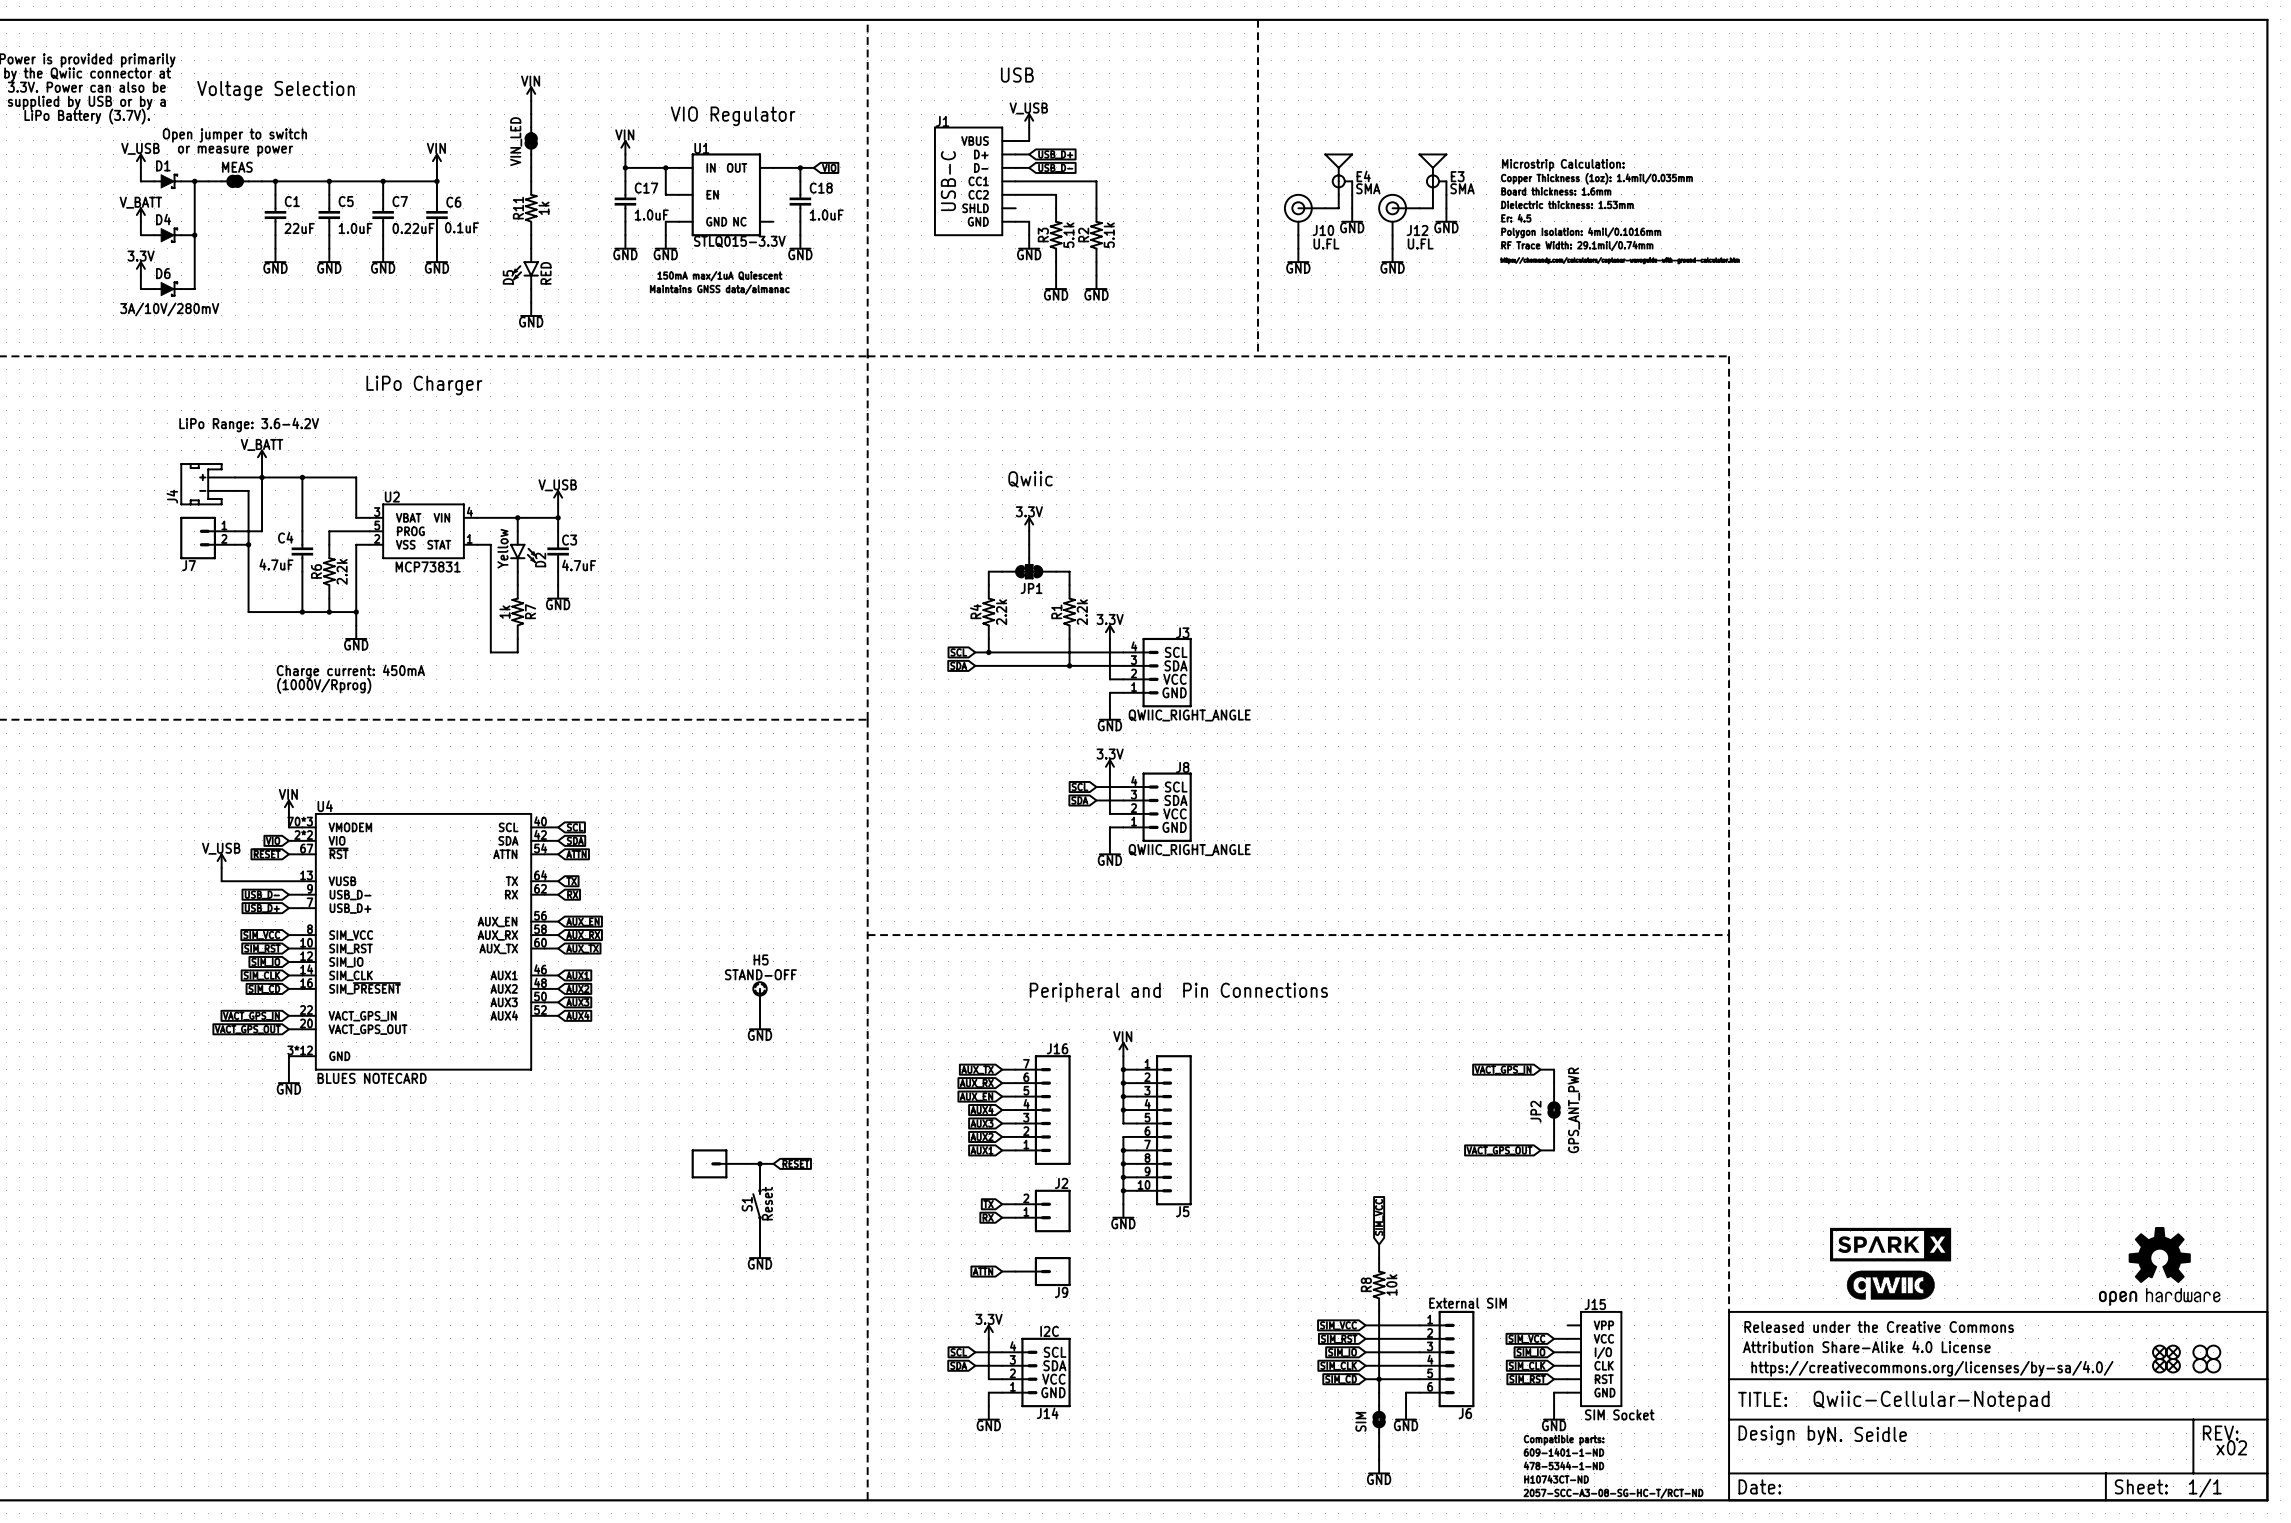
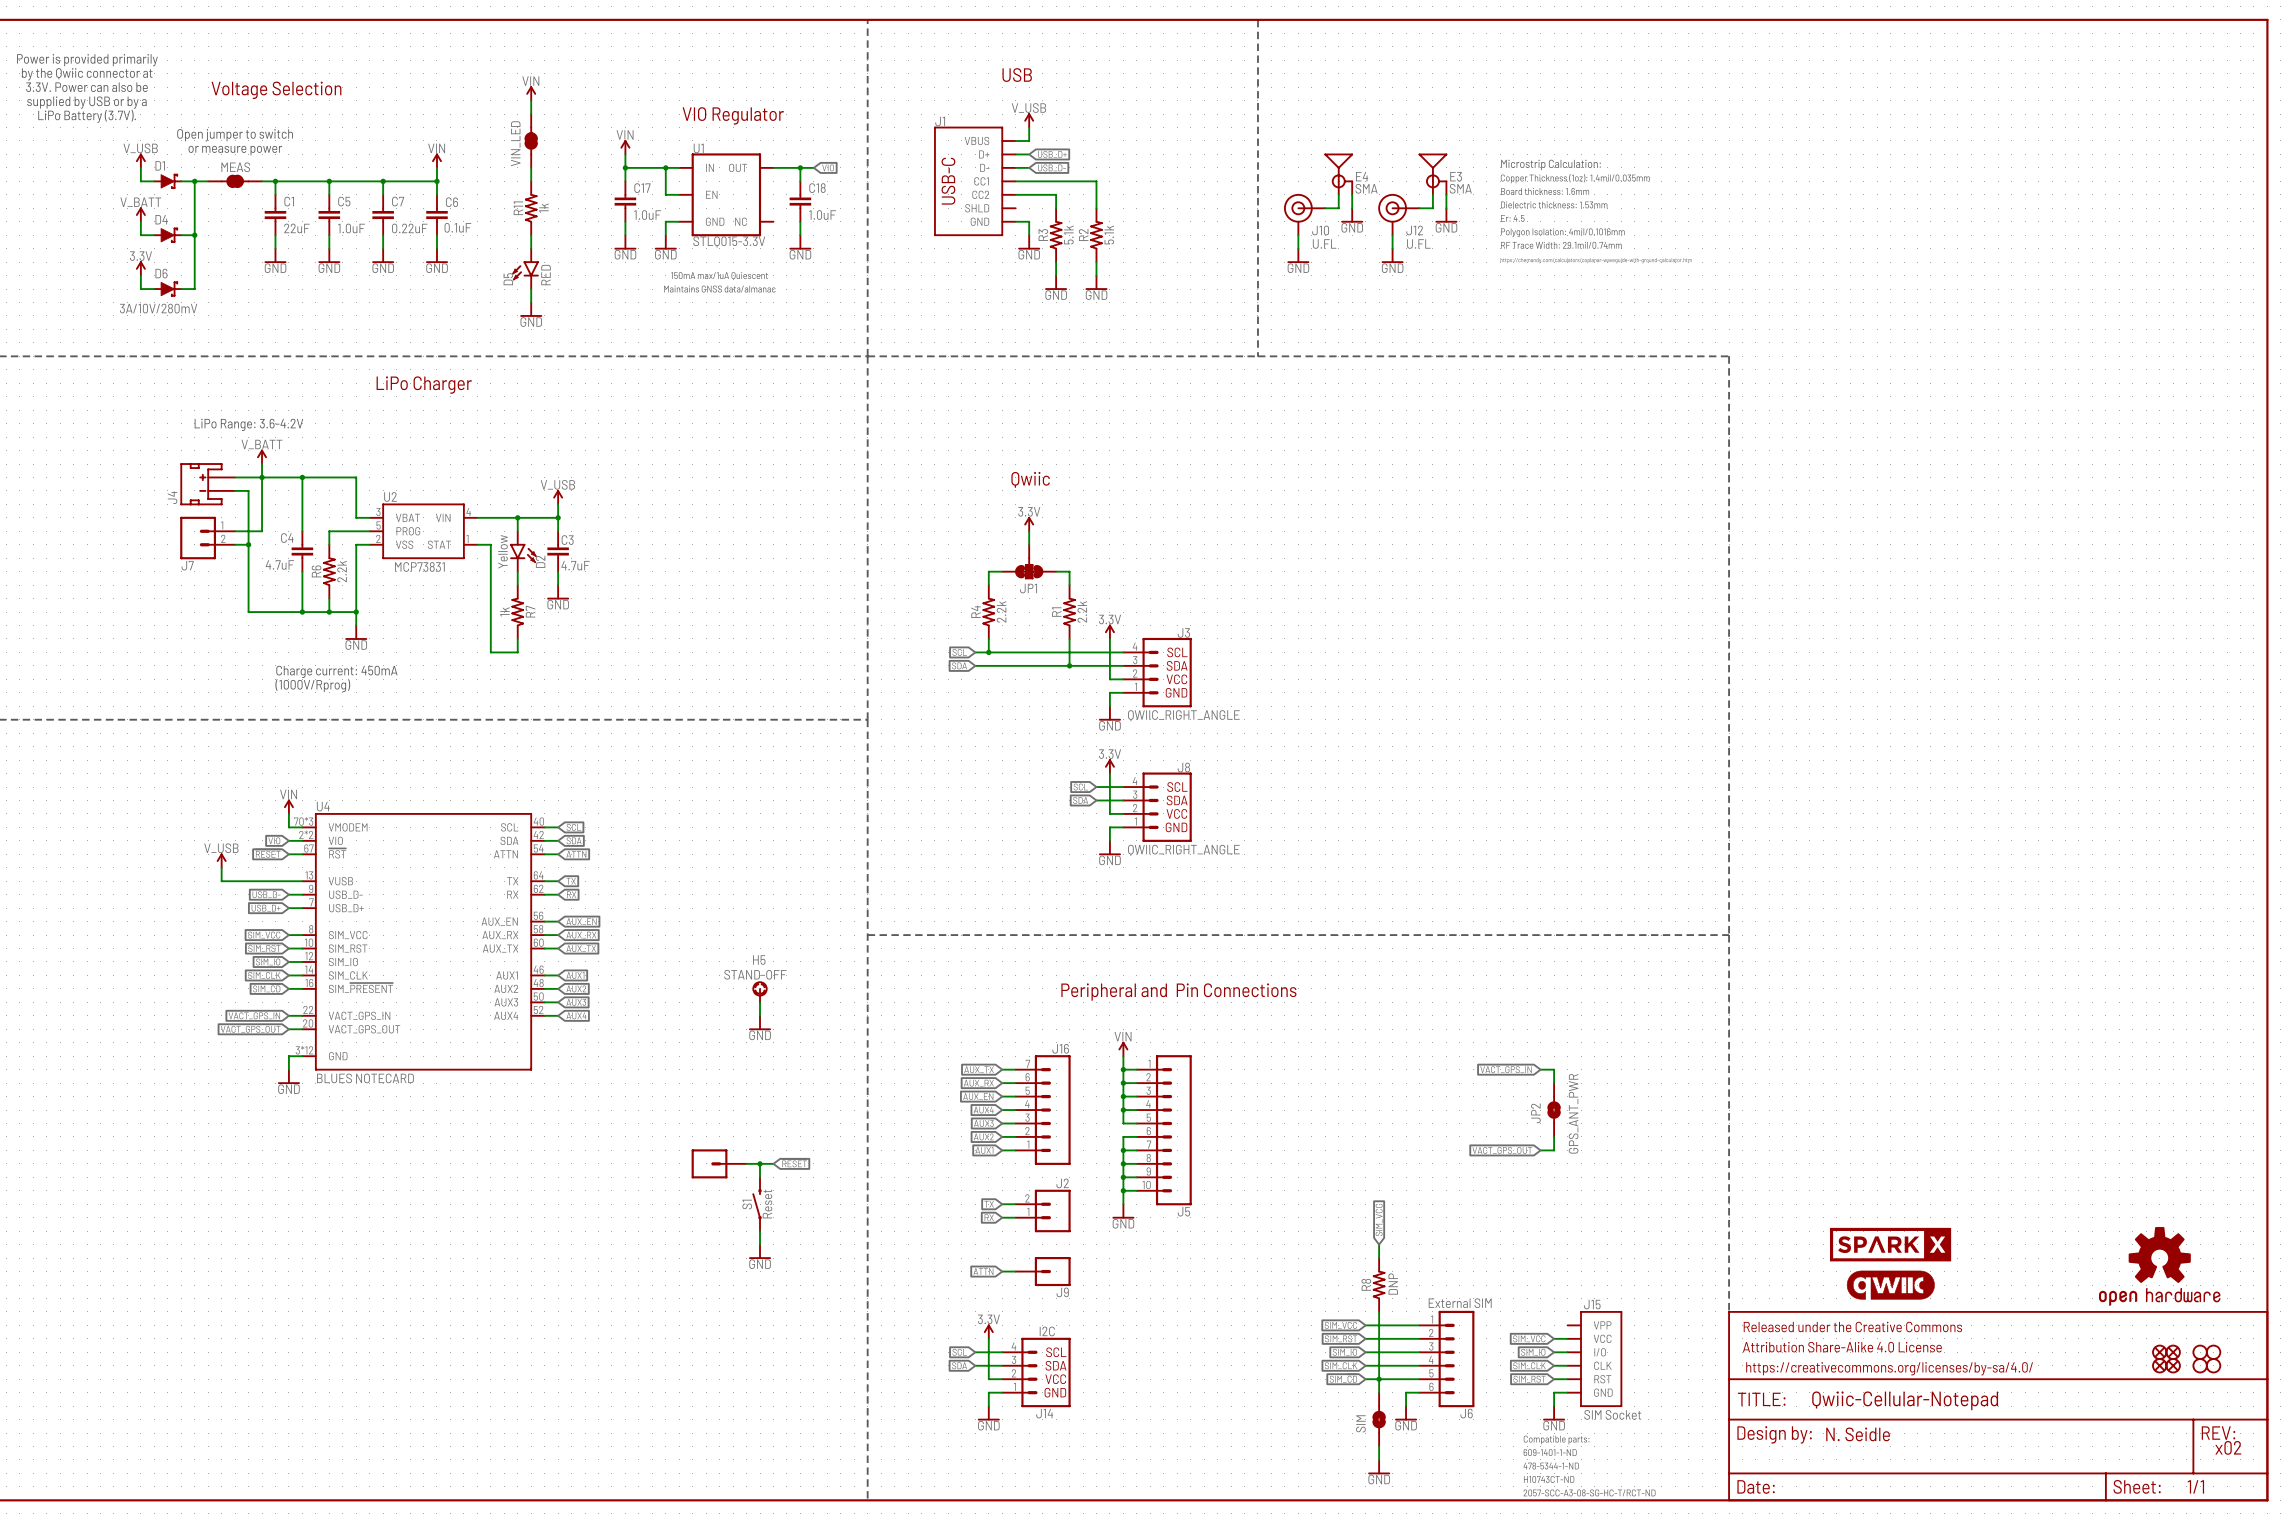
R8 value: 10k (1391, 1285) -> DNP (1393, 1284)

